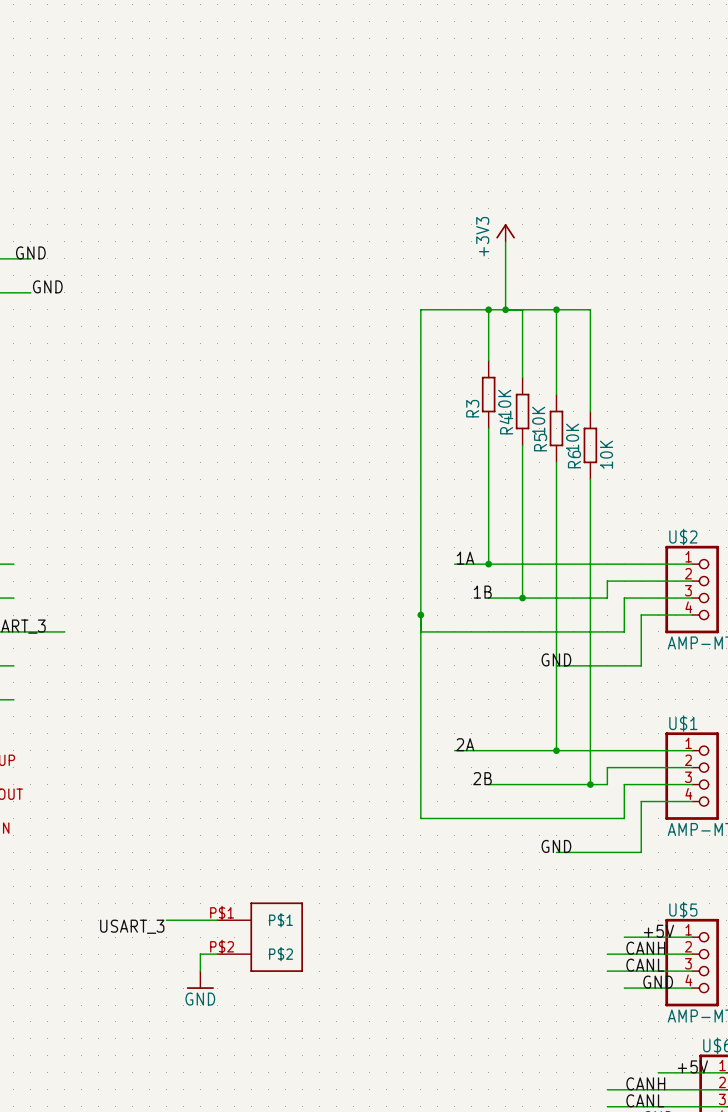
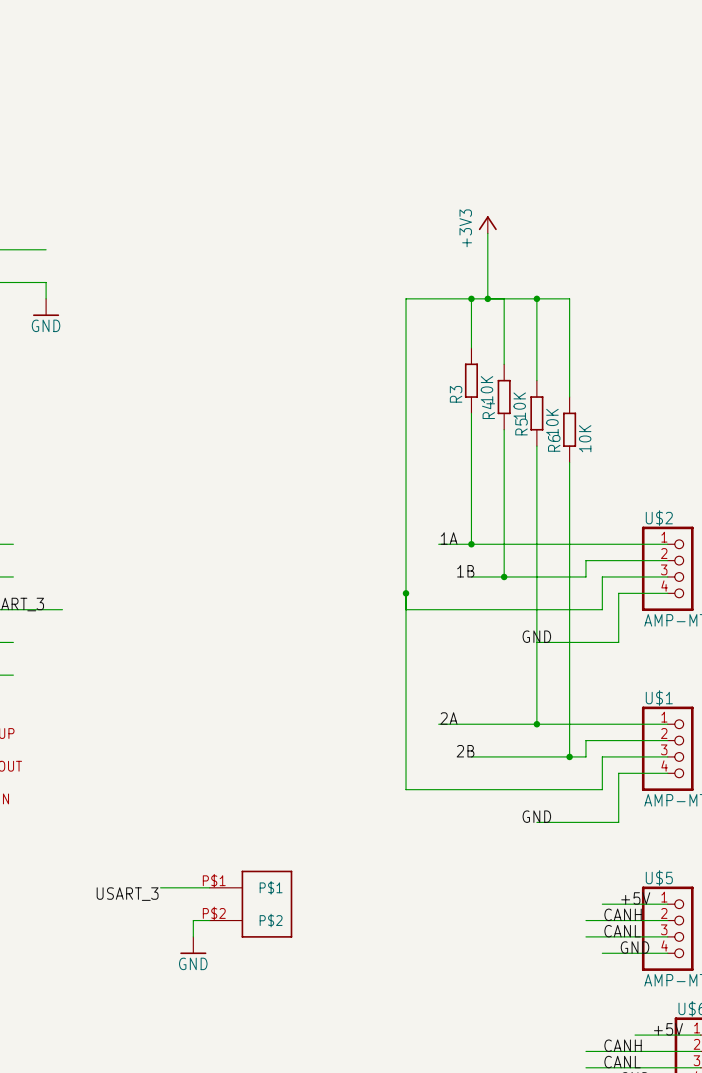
label: GND (30, 252) -> none
wire: none -> (29, 249) (46, 249)
label: GND (47, 286) -> none
wire: none -> (29, 282) (46, 282) (46, 298)
power symbol: none -> GND (46, 307)

